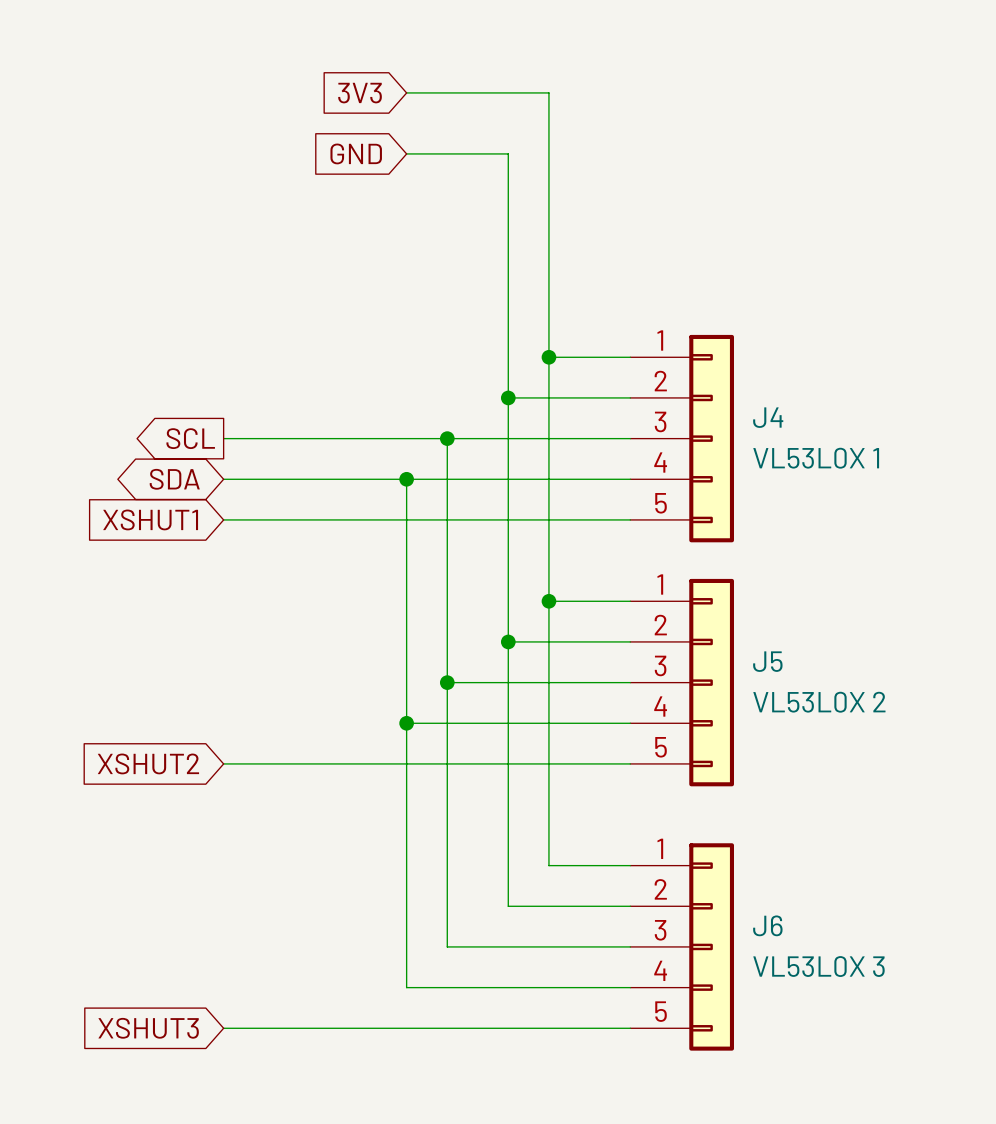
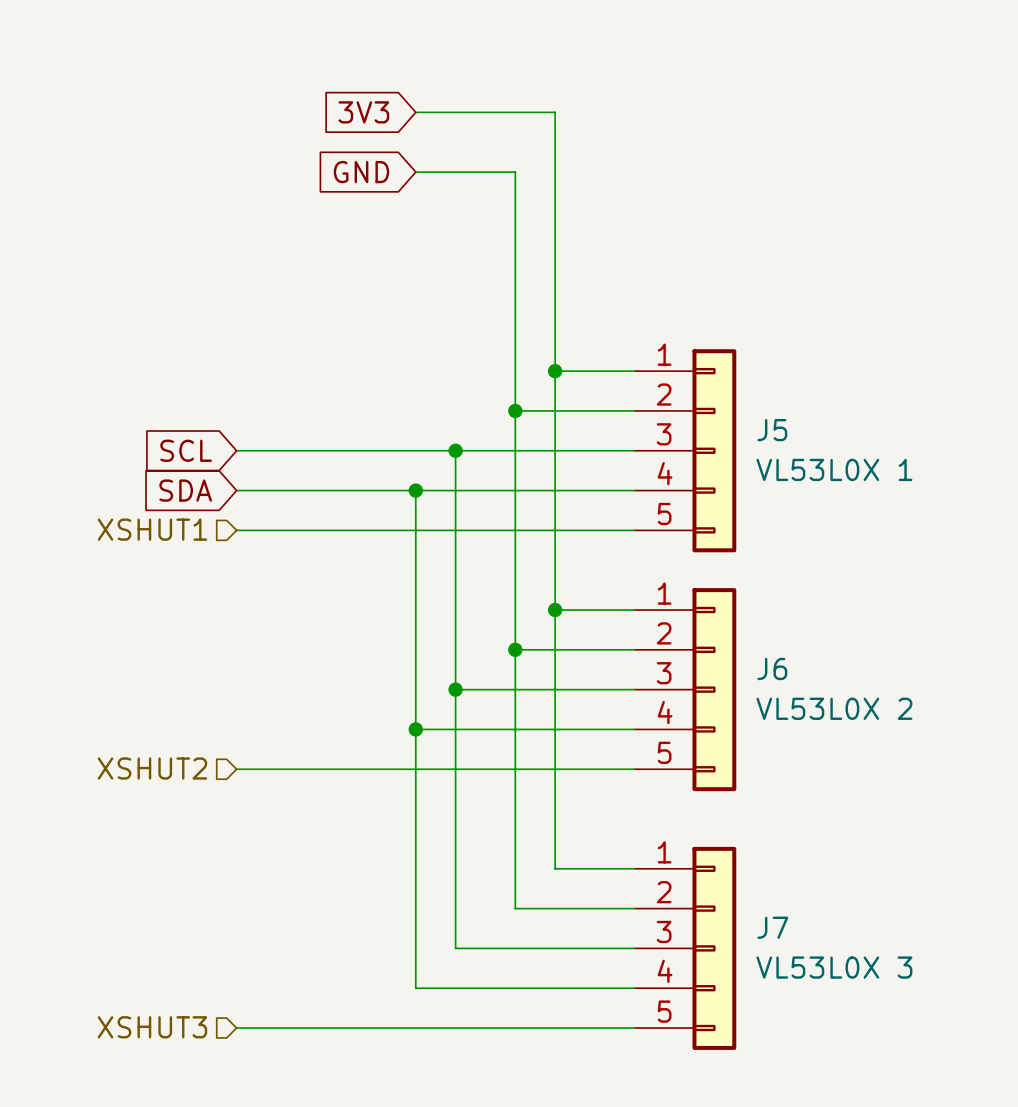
J4 name: J4 (768, 417) -> J5 (772, 430)
global label shape: output (190, 438) -> input (186, 450)
global label shape: bidirectional (174, 479) -> input (185, 490)
hierarchical label: none -> XSHUT1 (152, 529)
global label: XSHUT1 (150, 519) -> none
J5 name: J5 (767, 661) -> J6 (772, 668)
hierarchical label: none -> XSHUT2 (152, 768)
global label: XSHUT2 (148, 763) -> none
J6 name: J6 (767, 925) -> J7 (772, 927)
hierarchical label: none -> XSHUT3 (152, 1027)
global label: XSHUT3 (148, 1028) -> none

